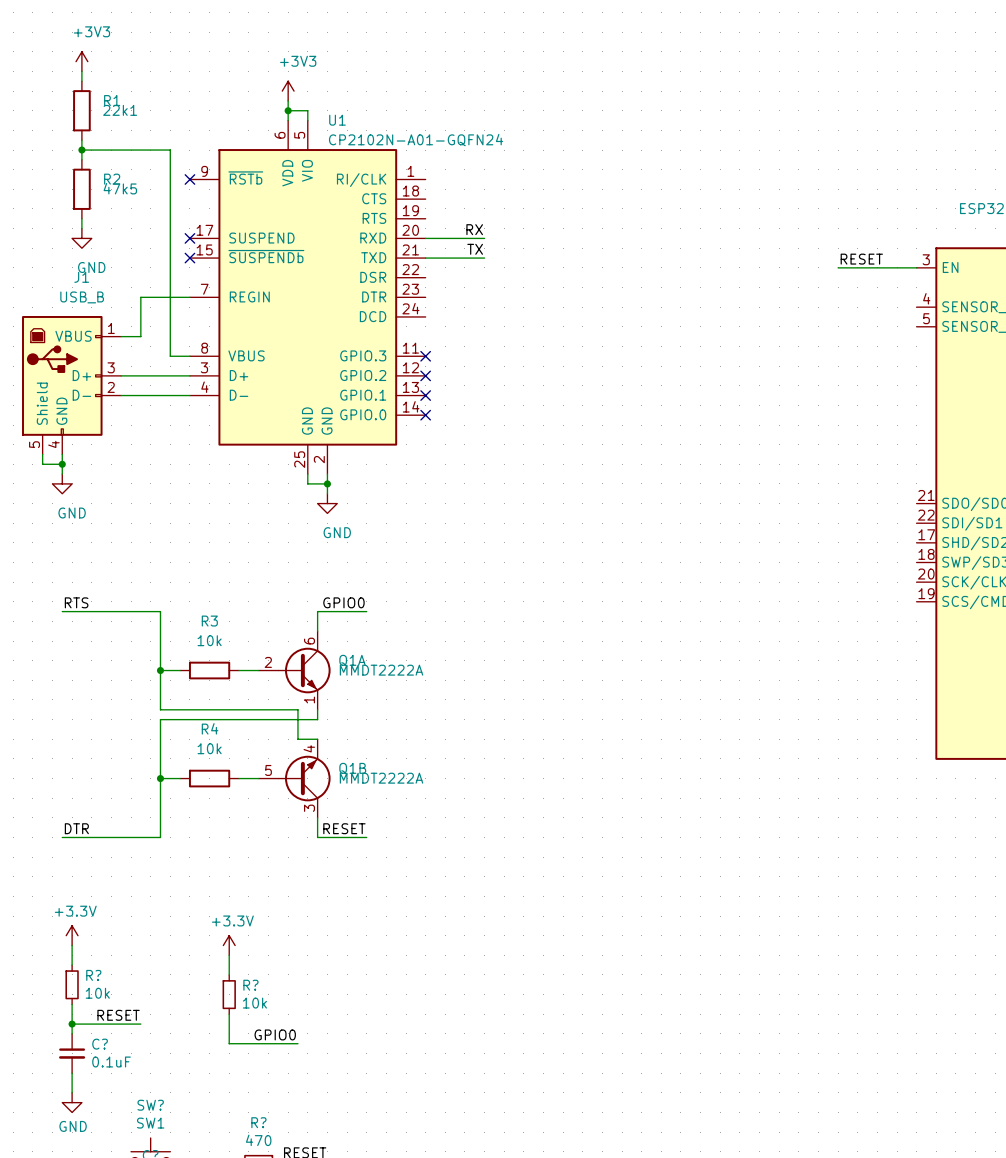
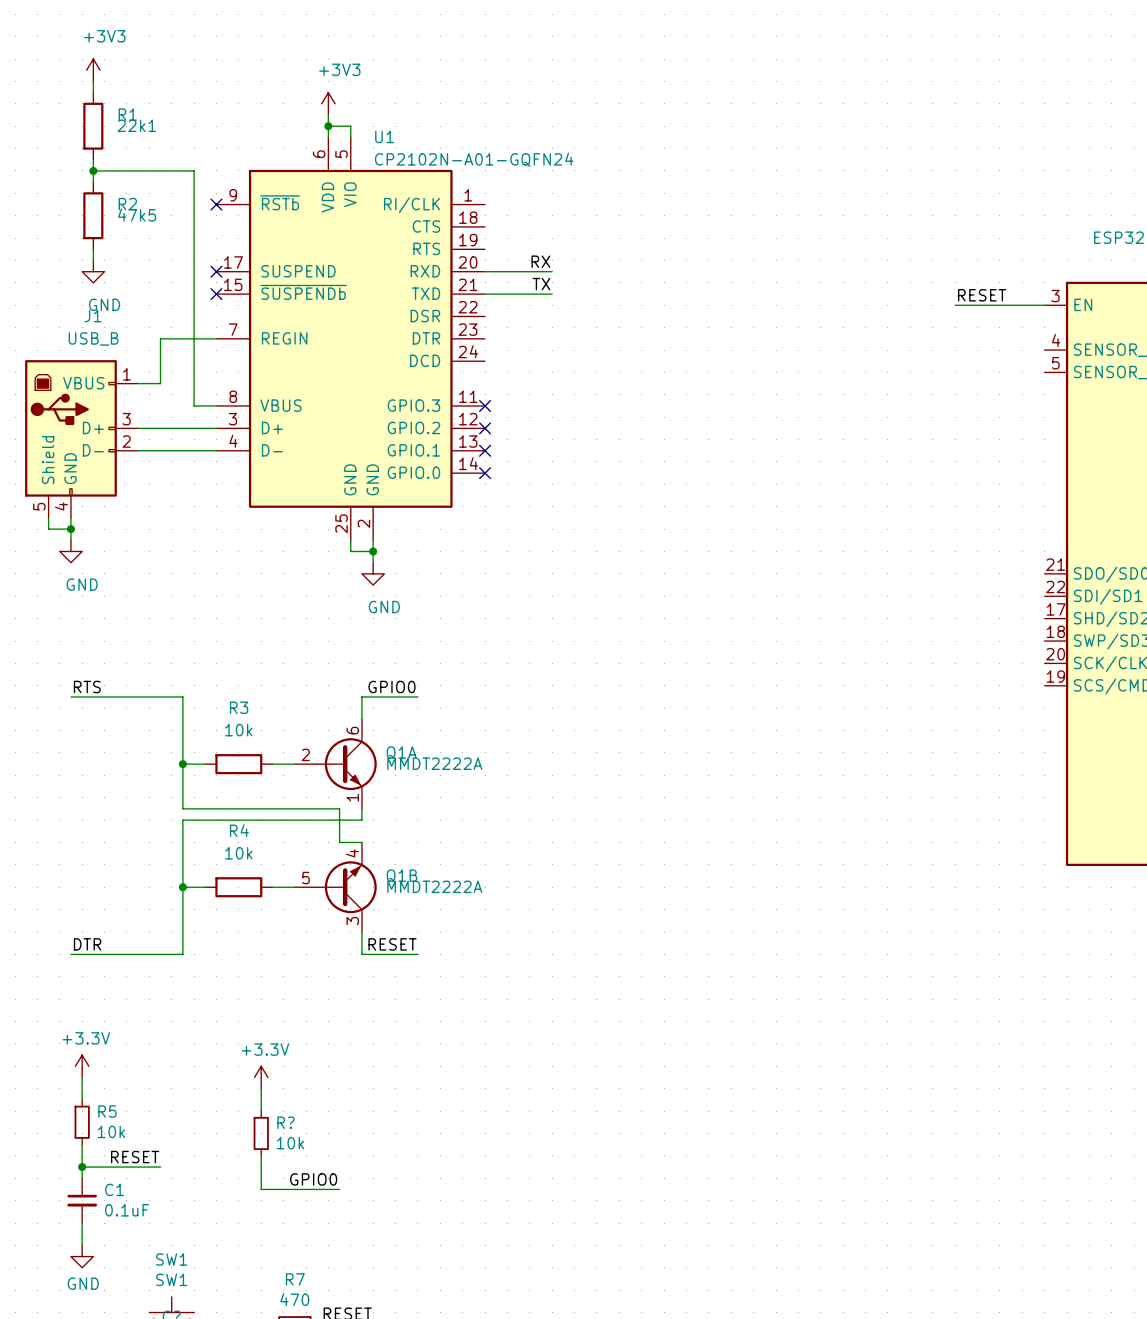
R? name: R? (93, 975) -> R5 (107, 1111)
C? name: C? (100, 1044) -> C1 (114, 1189)
SW? name: SW? (150, 1105) -> SW1 (171, 1259)
R? name: R? (258, 1122) -> R7 (295, 1279)

